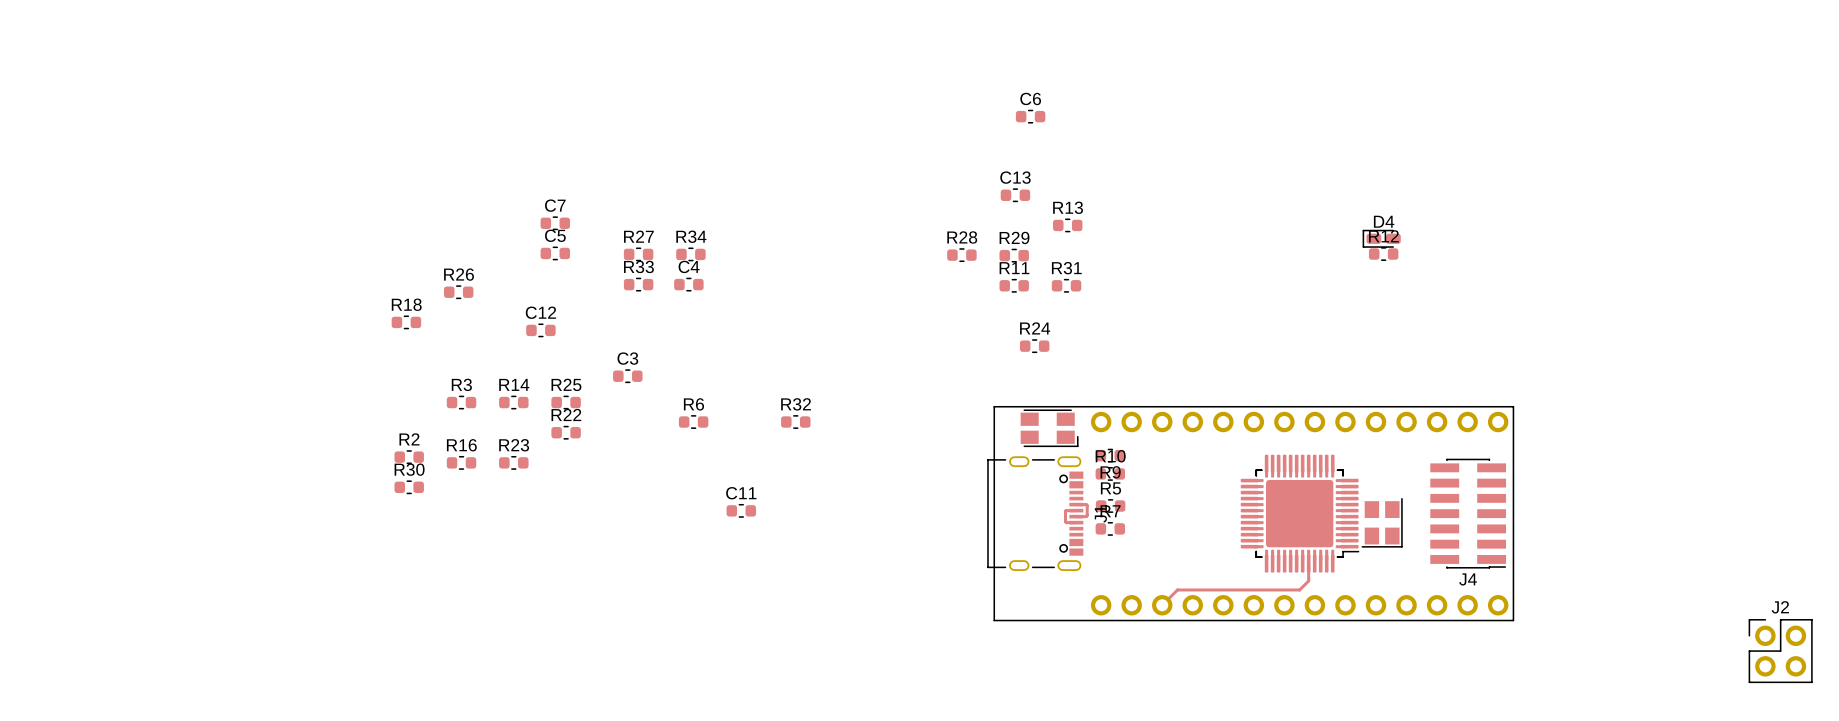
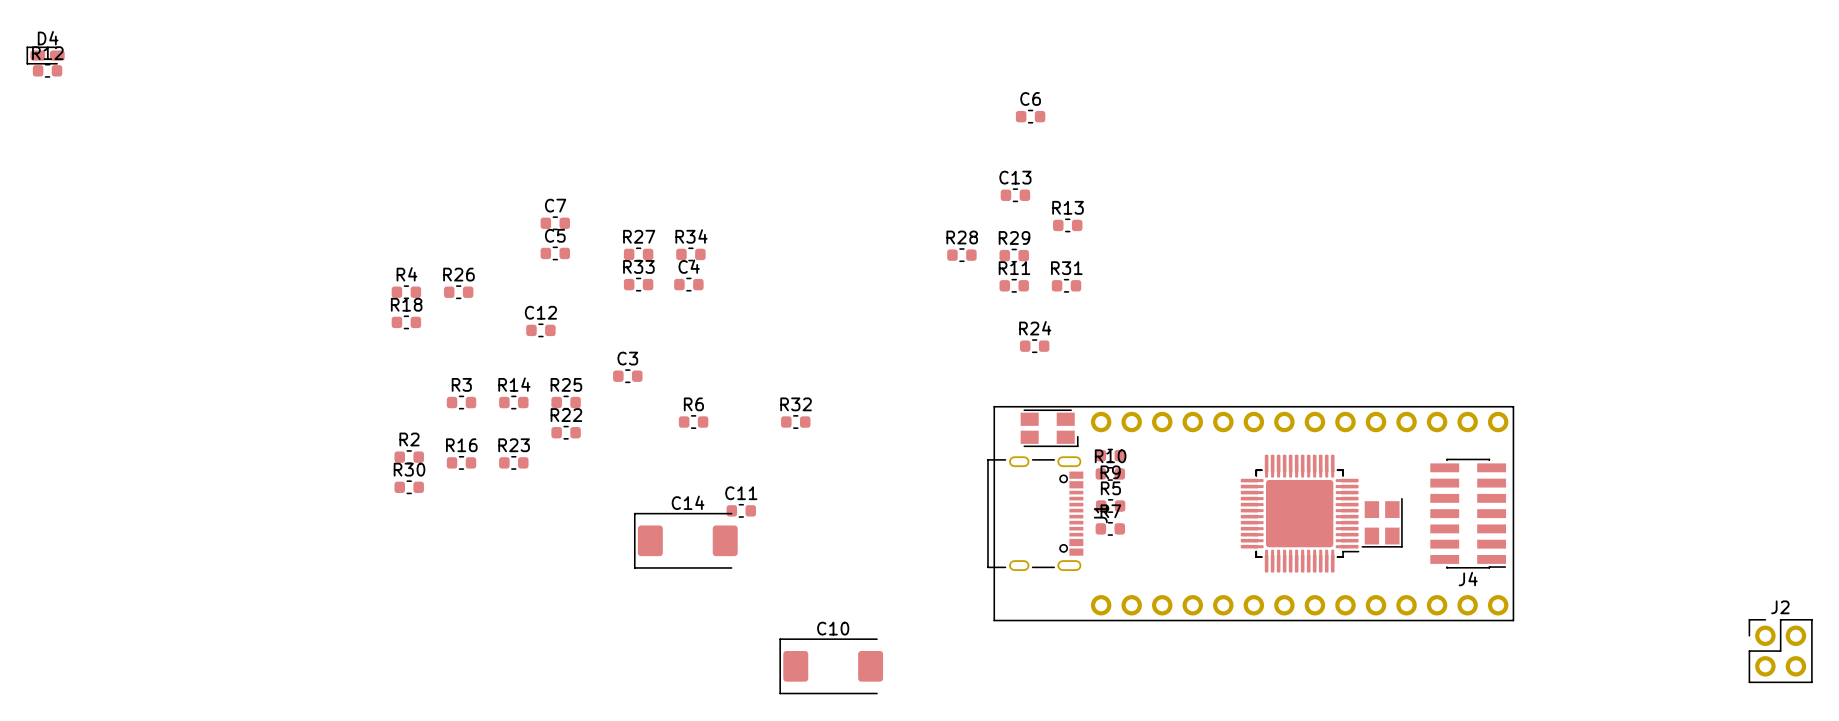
D4 position: (1381, 238) -> (45, 55)
R12 position: (1383, 254) -> (47, 70)
R4: none -> (406, 292)
track: (1076, 504) (1087, 505) (1087, 515) (1076, 516) -> none
track: (1076, 510) (1065, 511) (1065, 521) (1076, 522) -> none
C14: none -> (685, 540)
track: (1308, 563) (1308, 580) (1299, 589) (1177, 589) (1162, 605) -> none
C10: none -> (831, 666)

